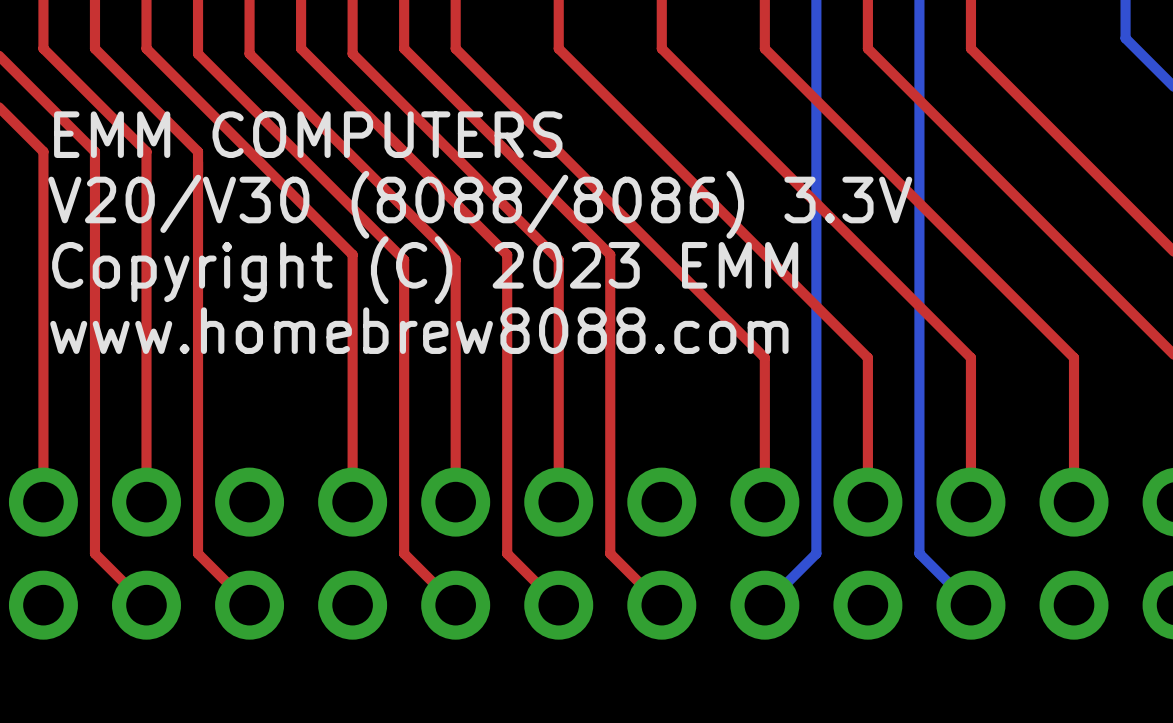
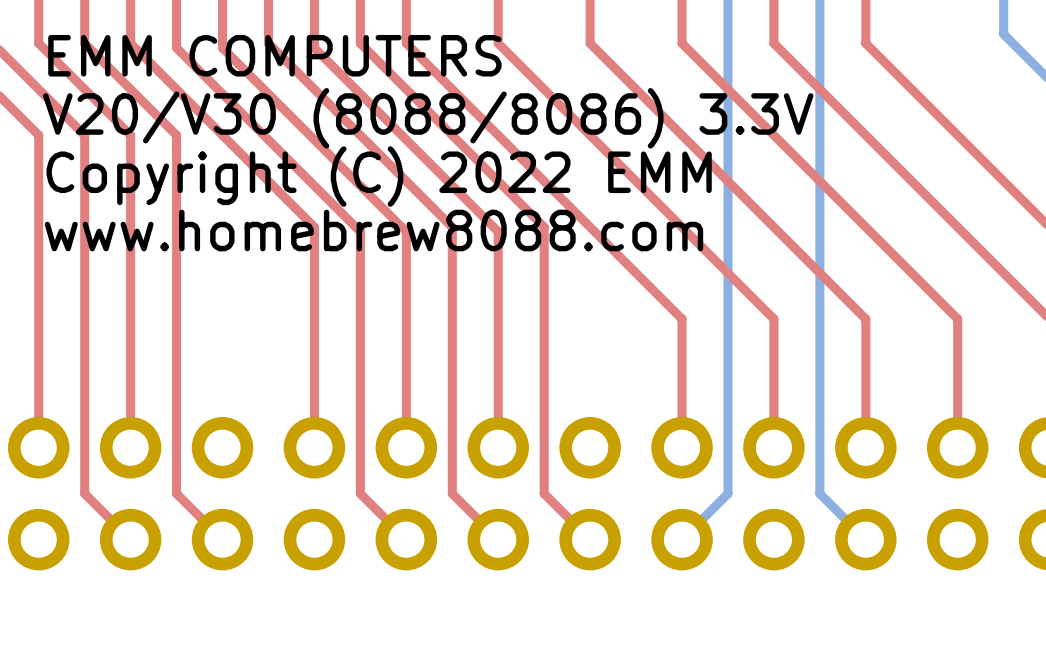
text position: EMM COMPUTERS (308, 134) -> EMM COMPUTERS (274, 55)
text position: V20/V30 (8088/8086) 3.3V (480, 204) -> V20/V30 (8088/8086) 3.3V (428, 118)
text: Copyright (C) 2023 EMM (425, 270) -> Copyright (C) 2022 EMM (379, 176)
text position: www.homebrew8088.com (419, 330) -> www.homebrew8088.com (373, 230)

